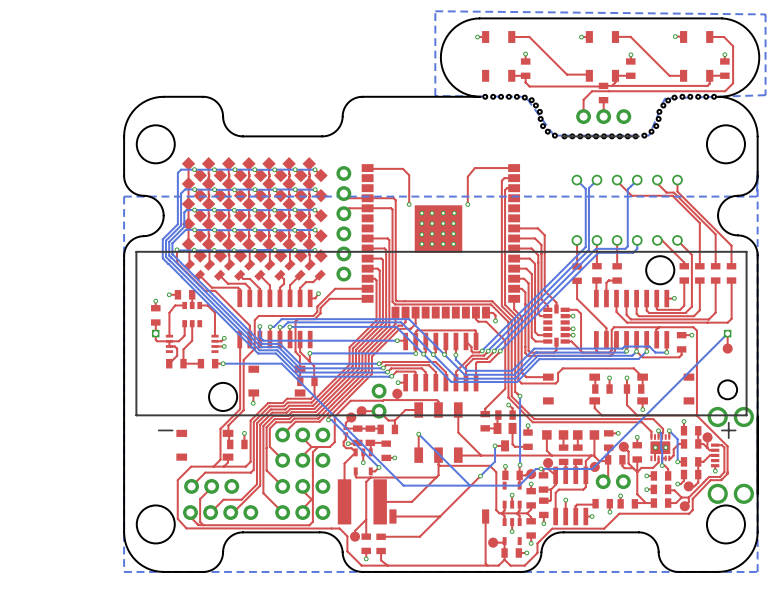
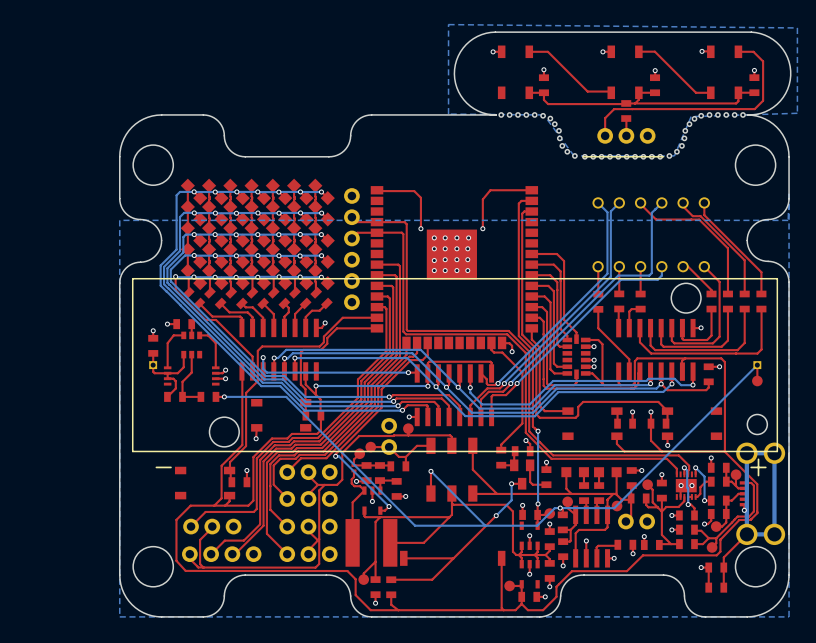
bottom track: none -> (774, 453) (746, 453) (746, 534) (774, 534) (774, 453)
top track: none -> (746, 534) (723, 557) (723, 587)
top track: none -> (701, 567) (708, 567) (708, 587)
via: none -> (701, 567)
part: none -> (716, 567)
part: none -> (716, 587)

